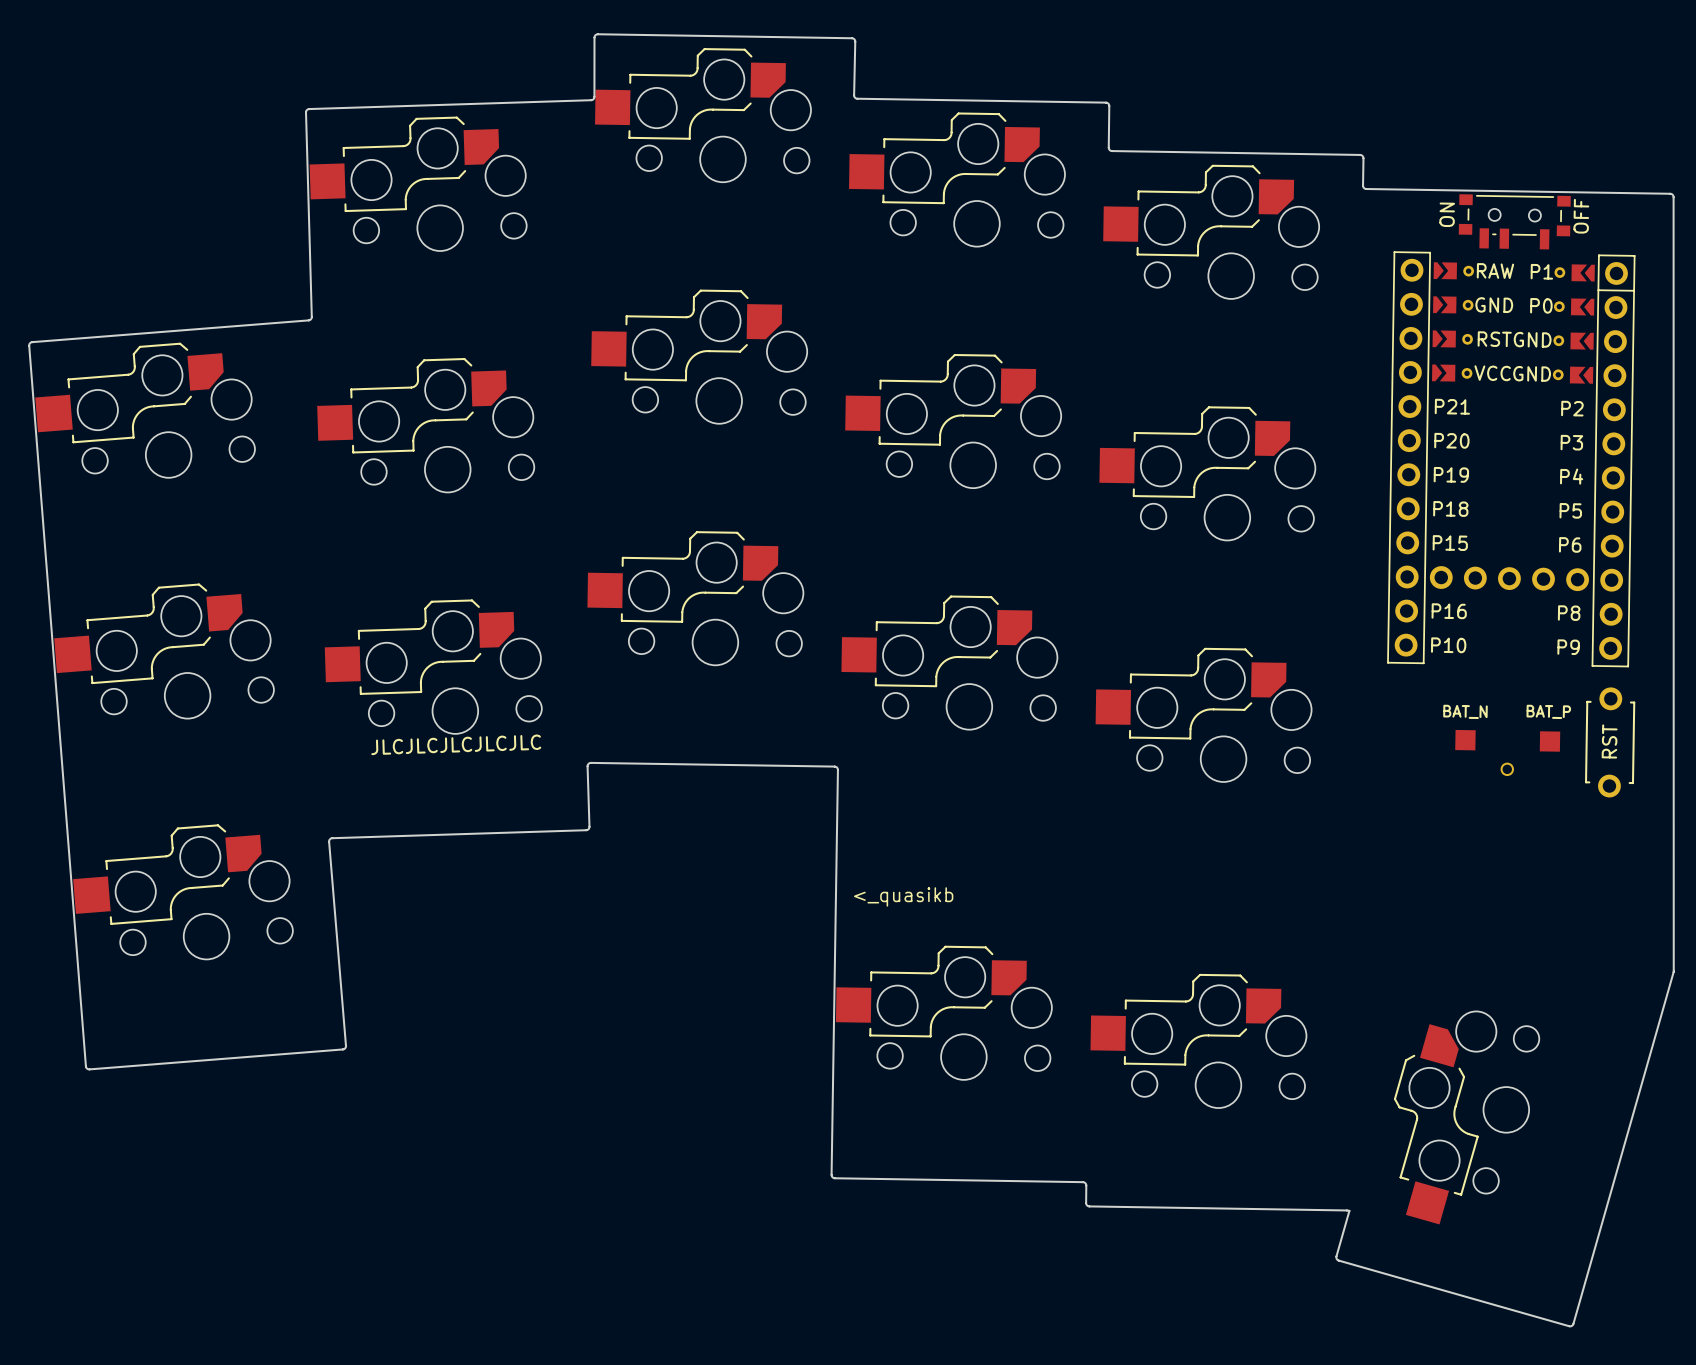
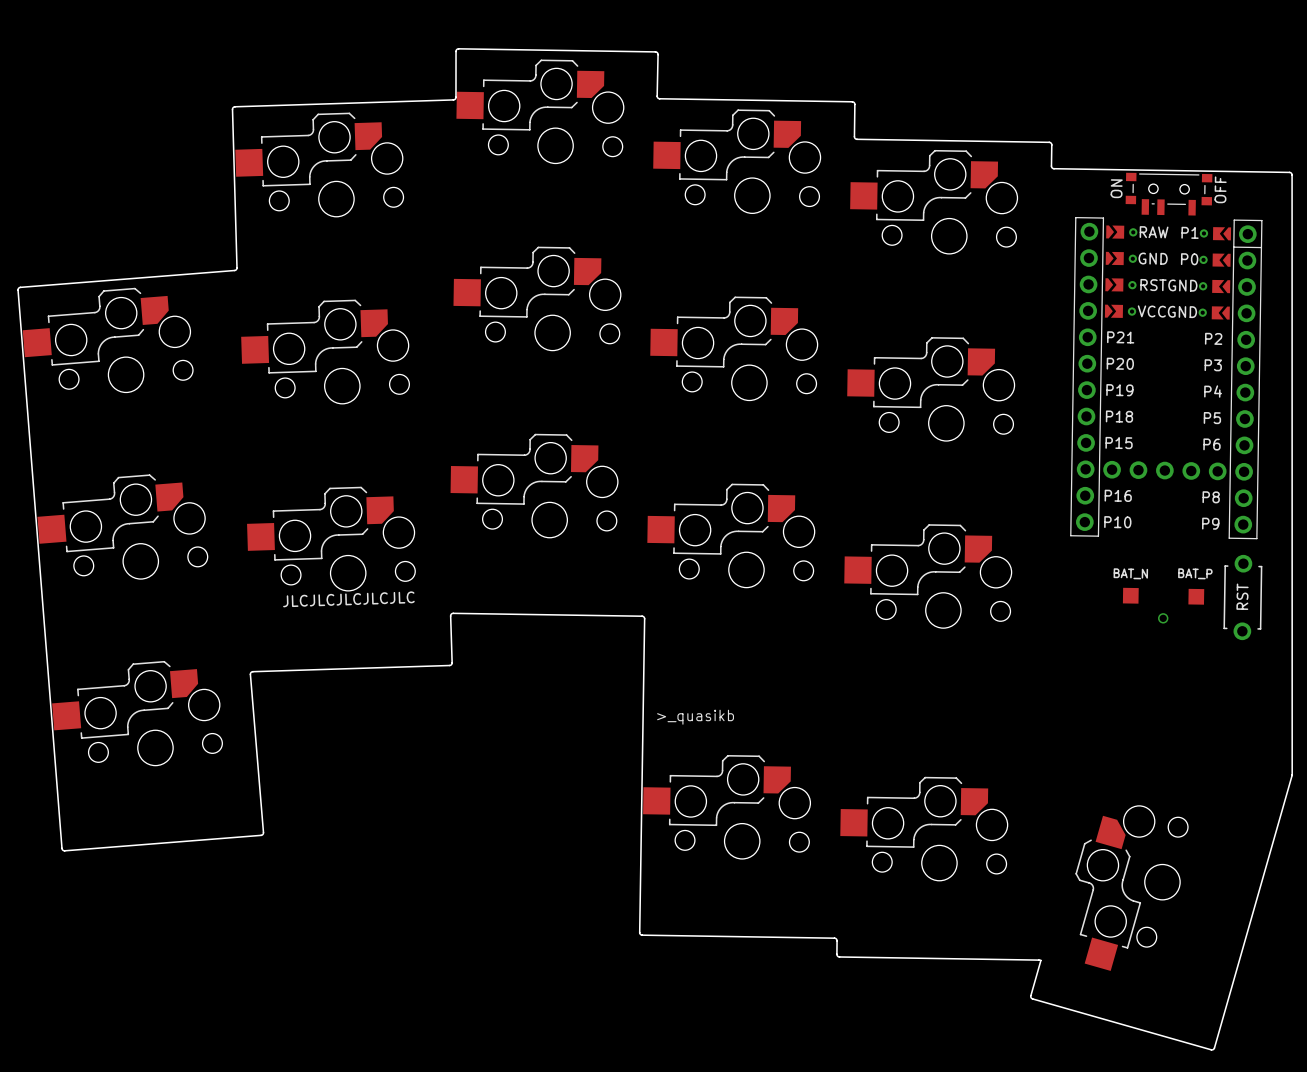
text: <_quasikb (903, 896) -> >_quasikb (695, 717)

